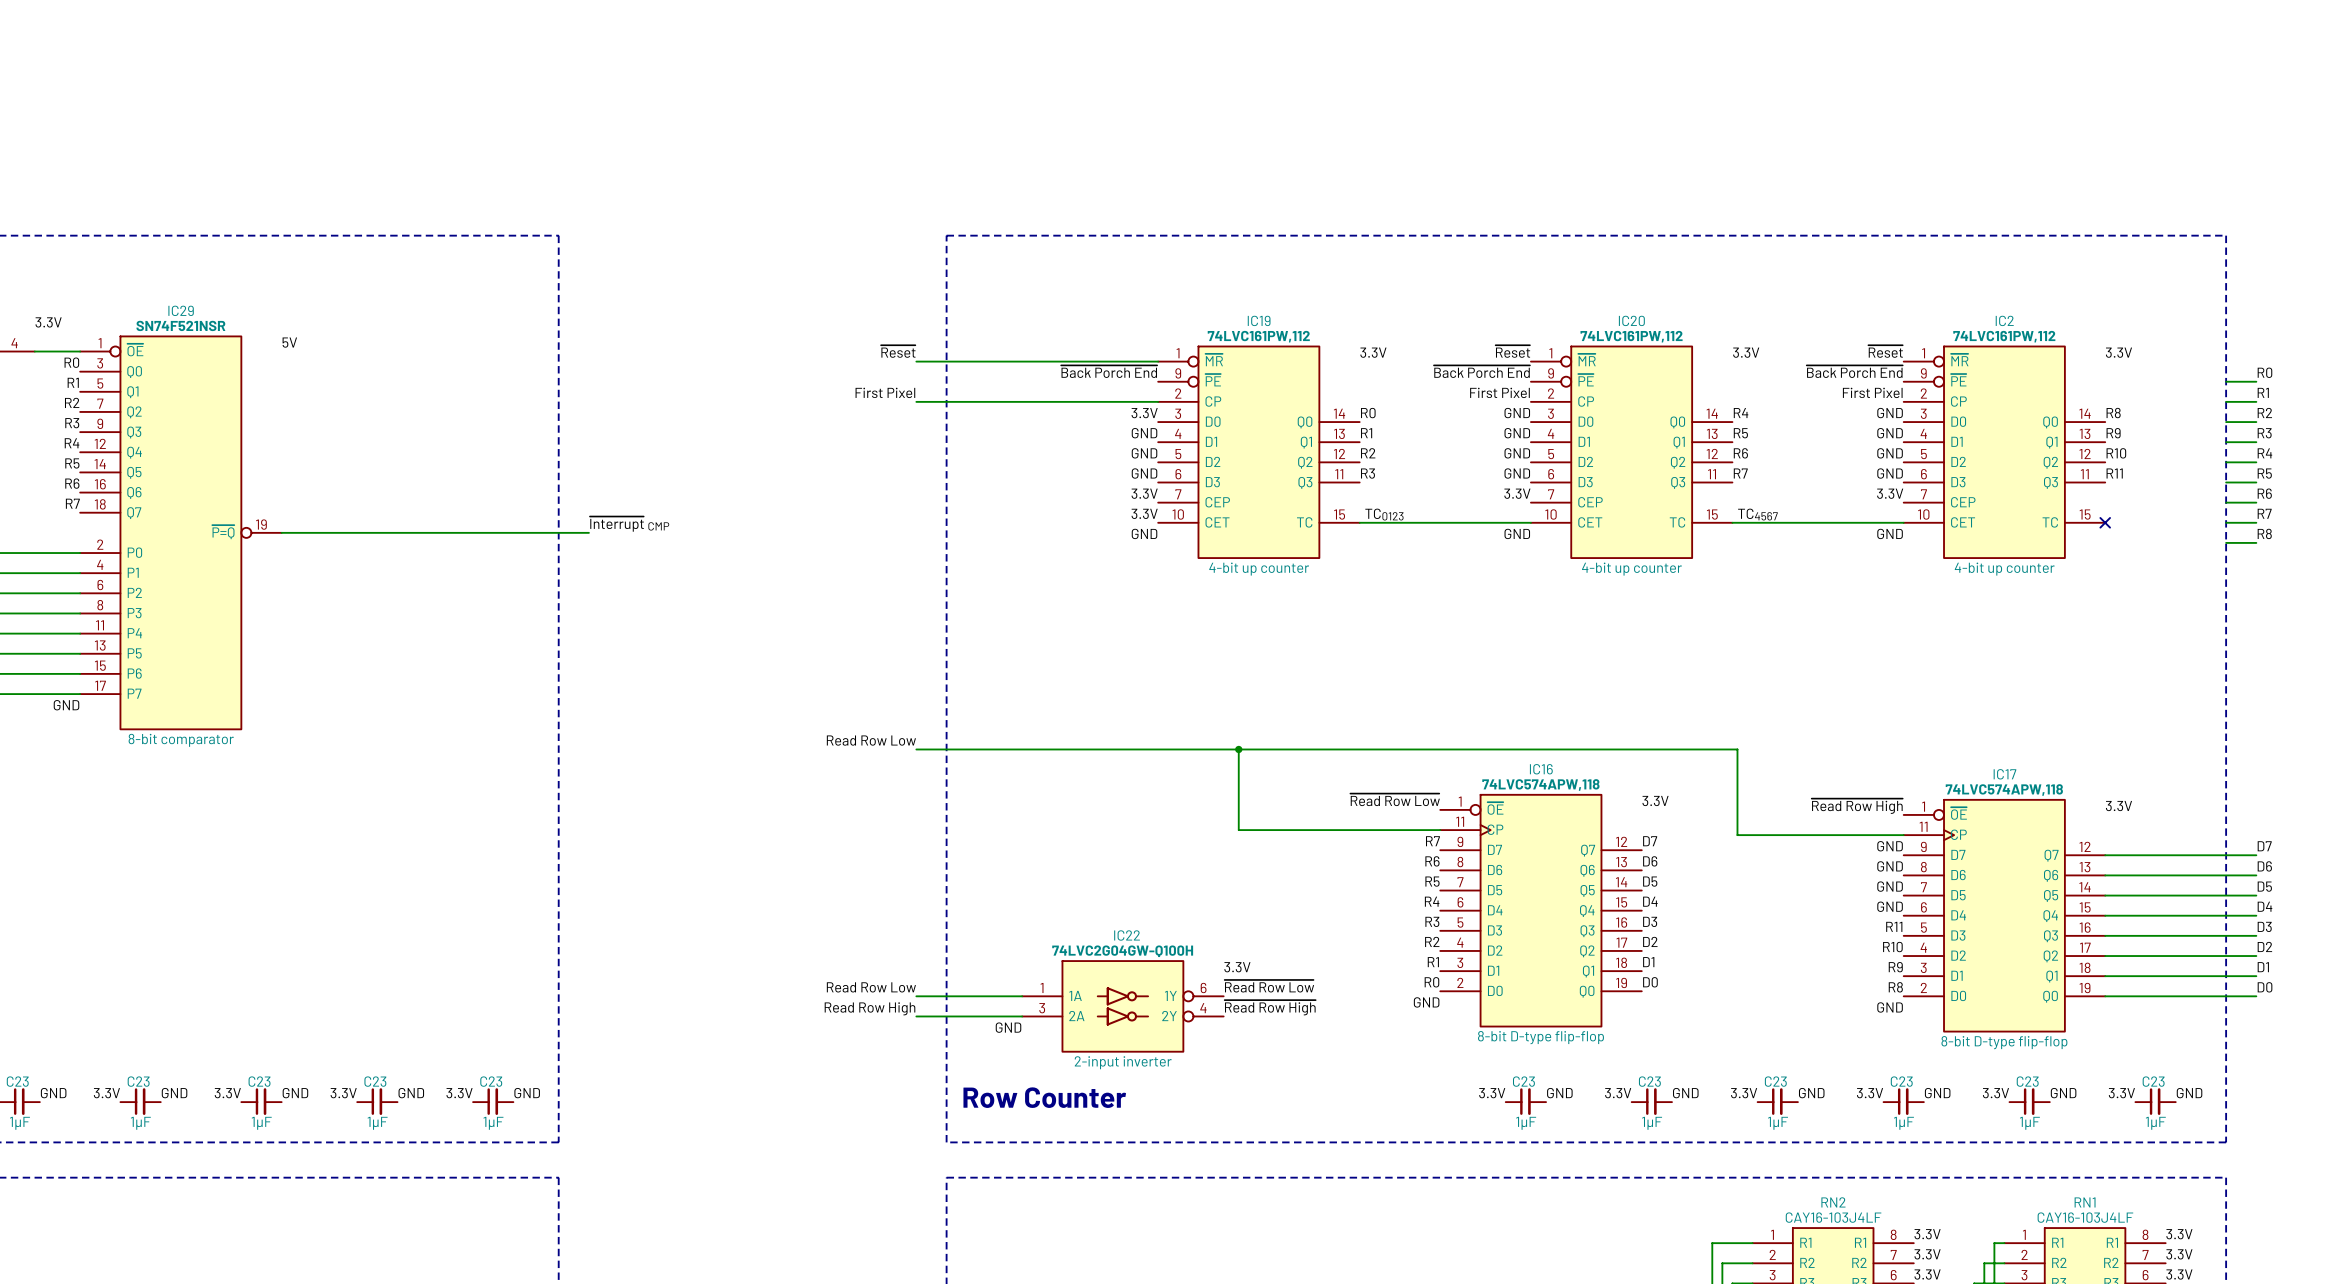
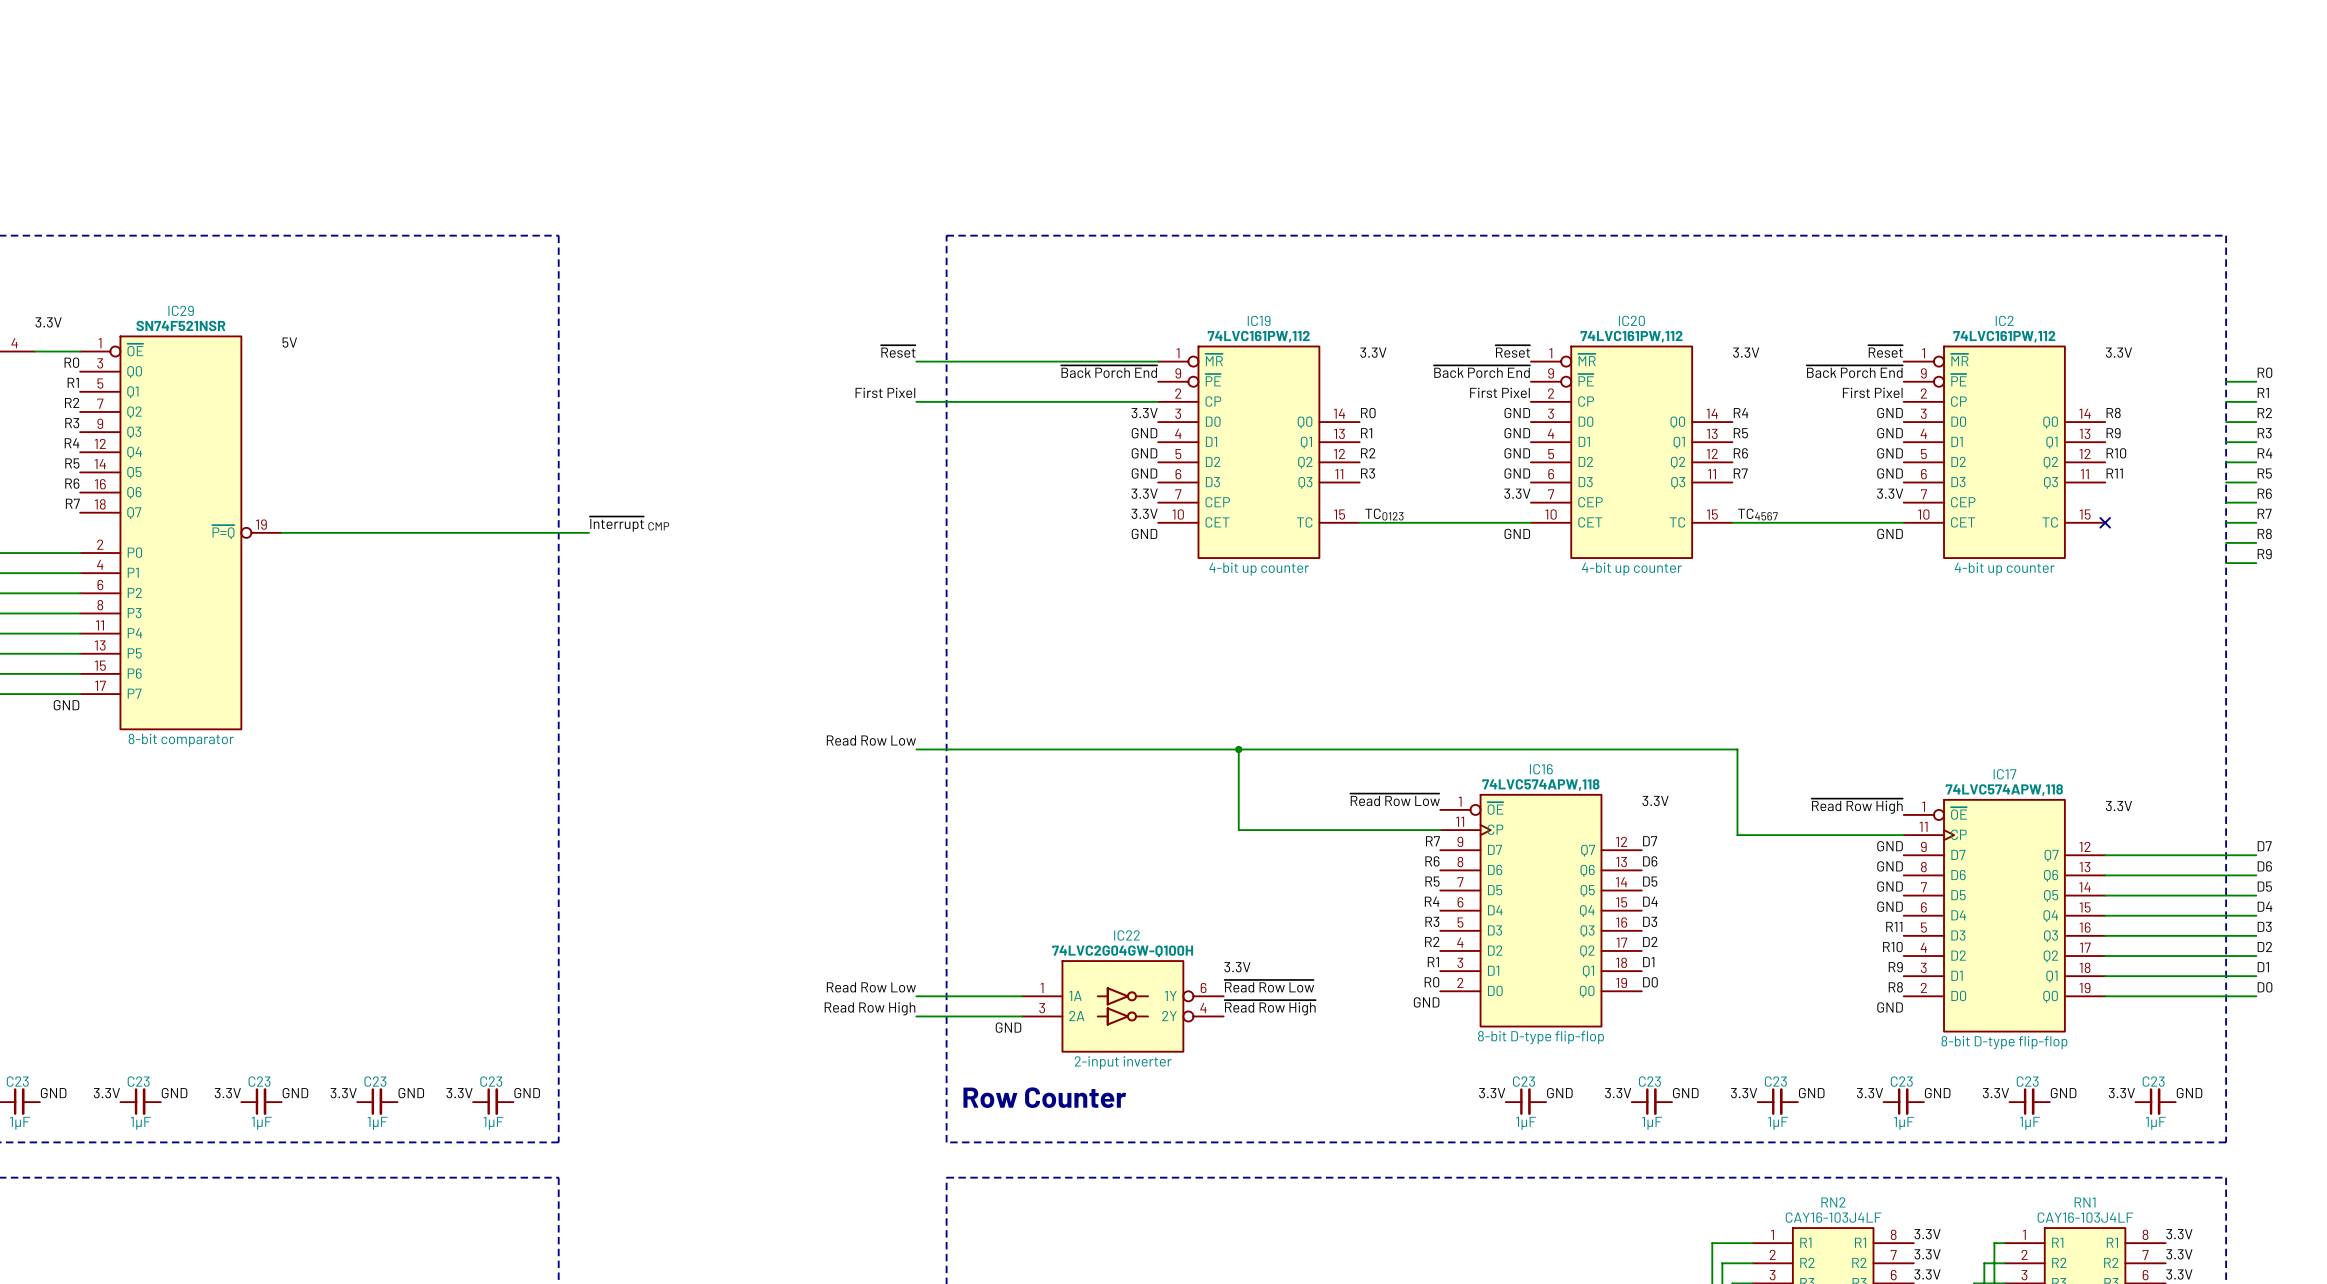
label: none -> R9 (2264, 554)
wire: none -> (2226, 563) (2256, 563)

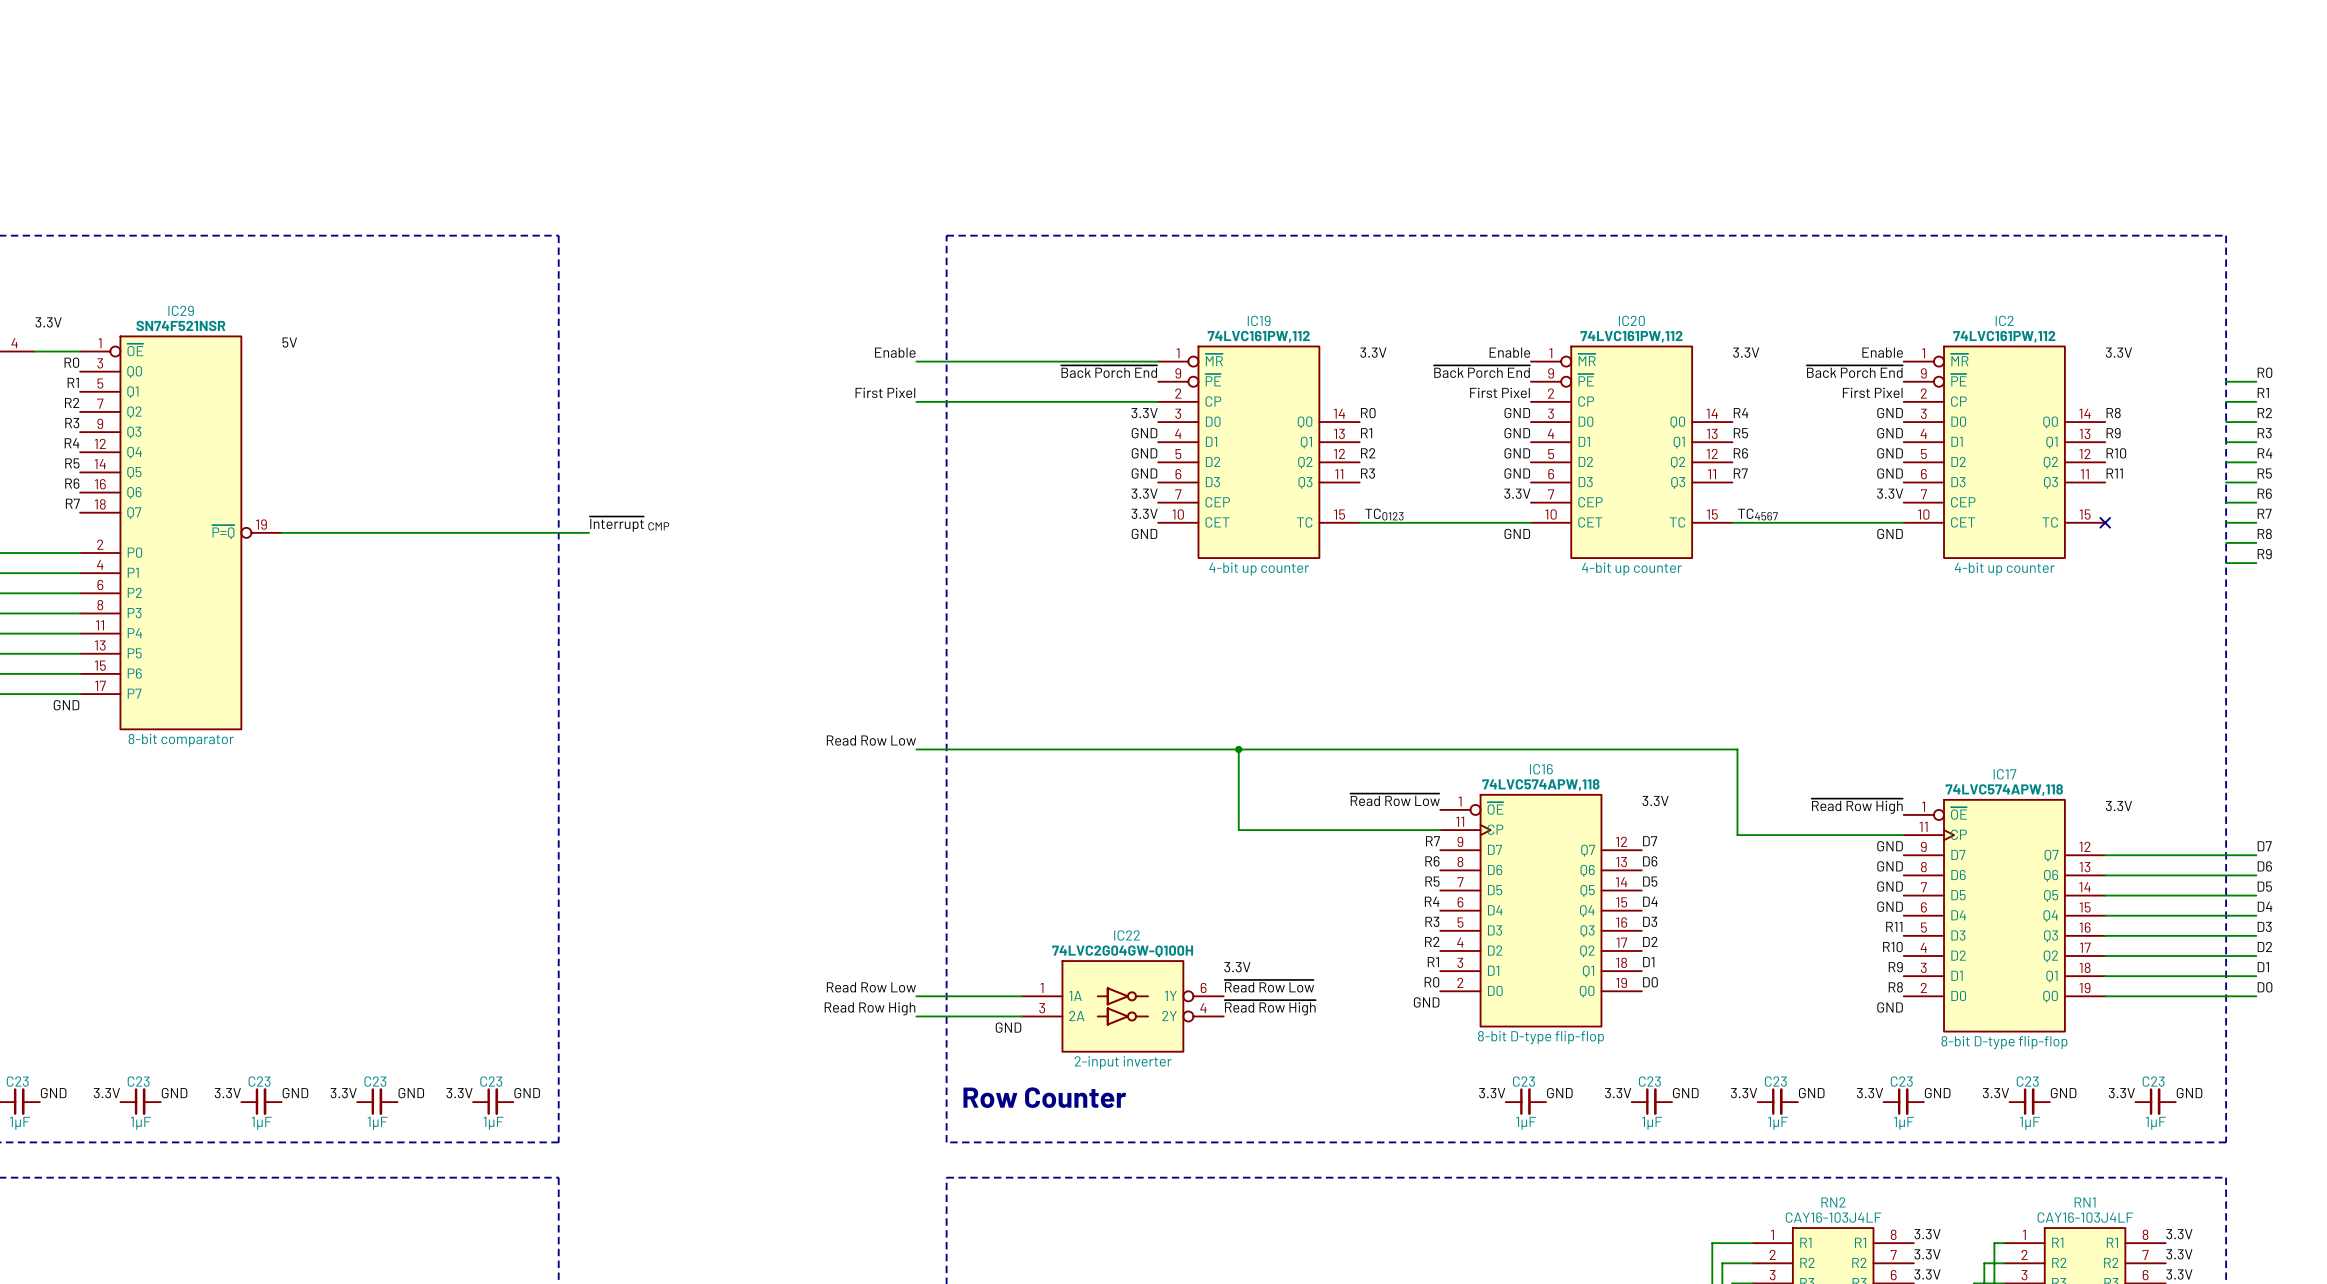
label: ~{Reset} (898, 351) -> Enable (895, 352)
label: ~{Reset} (1512, 351) -> Enable (1509, 352)
label: ~{Reset} (1885, 351) -> Enable (1882, 352)

